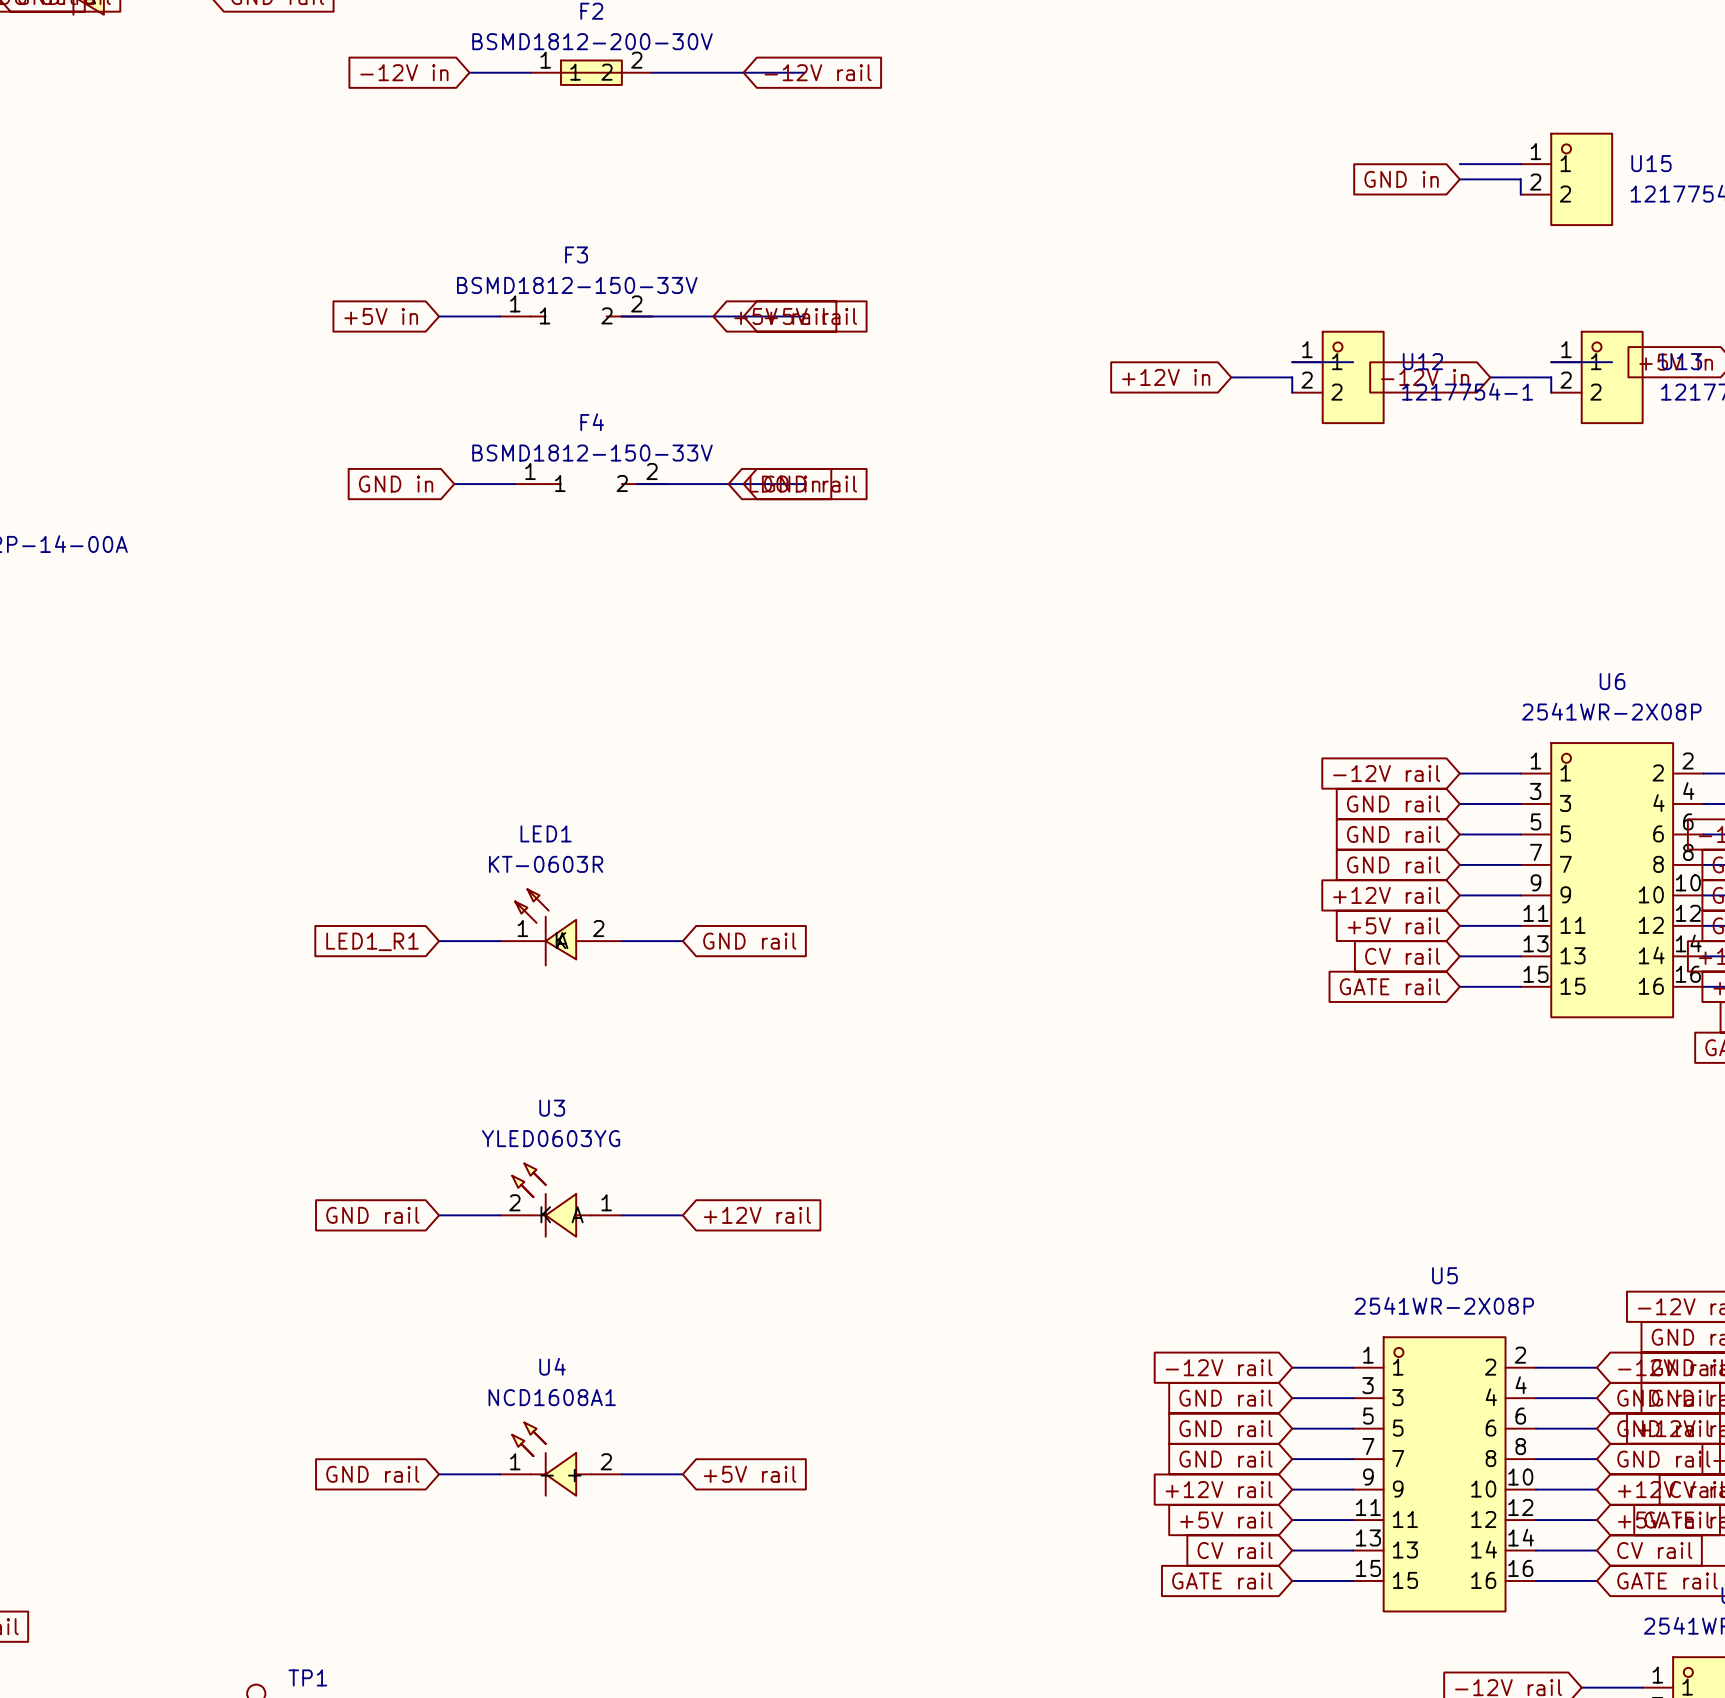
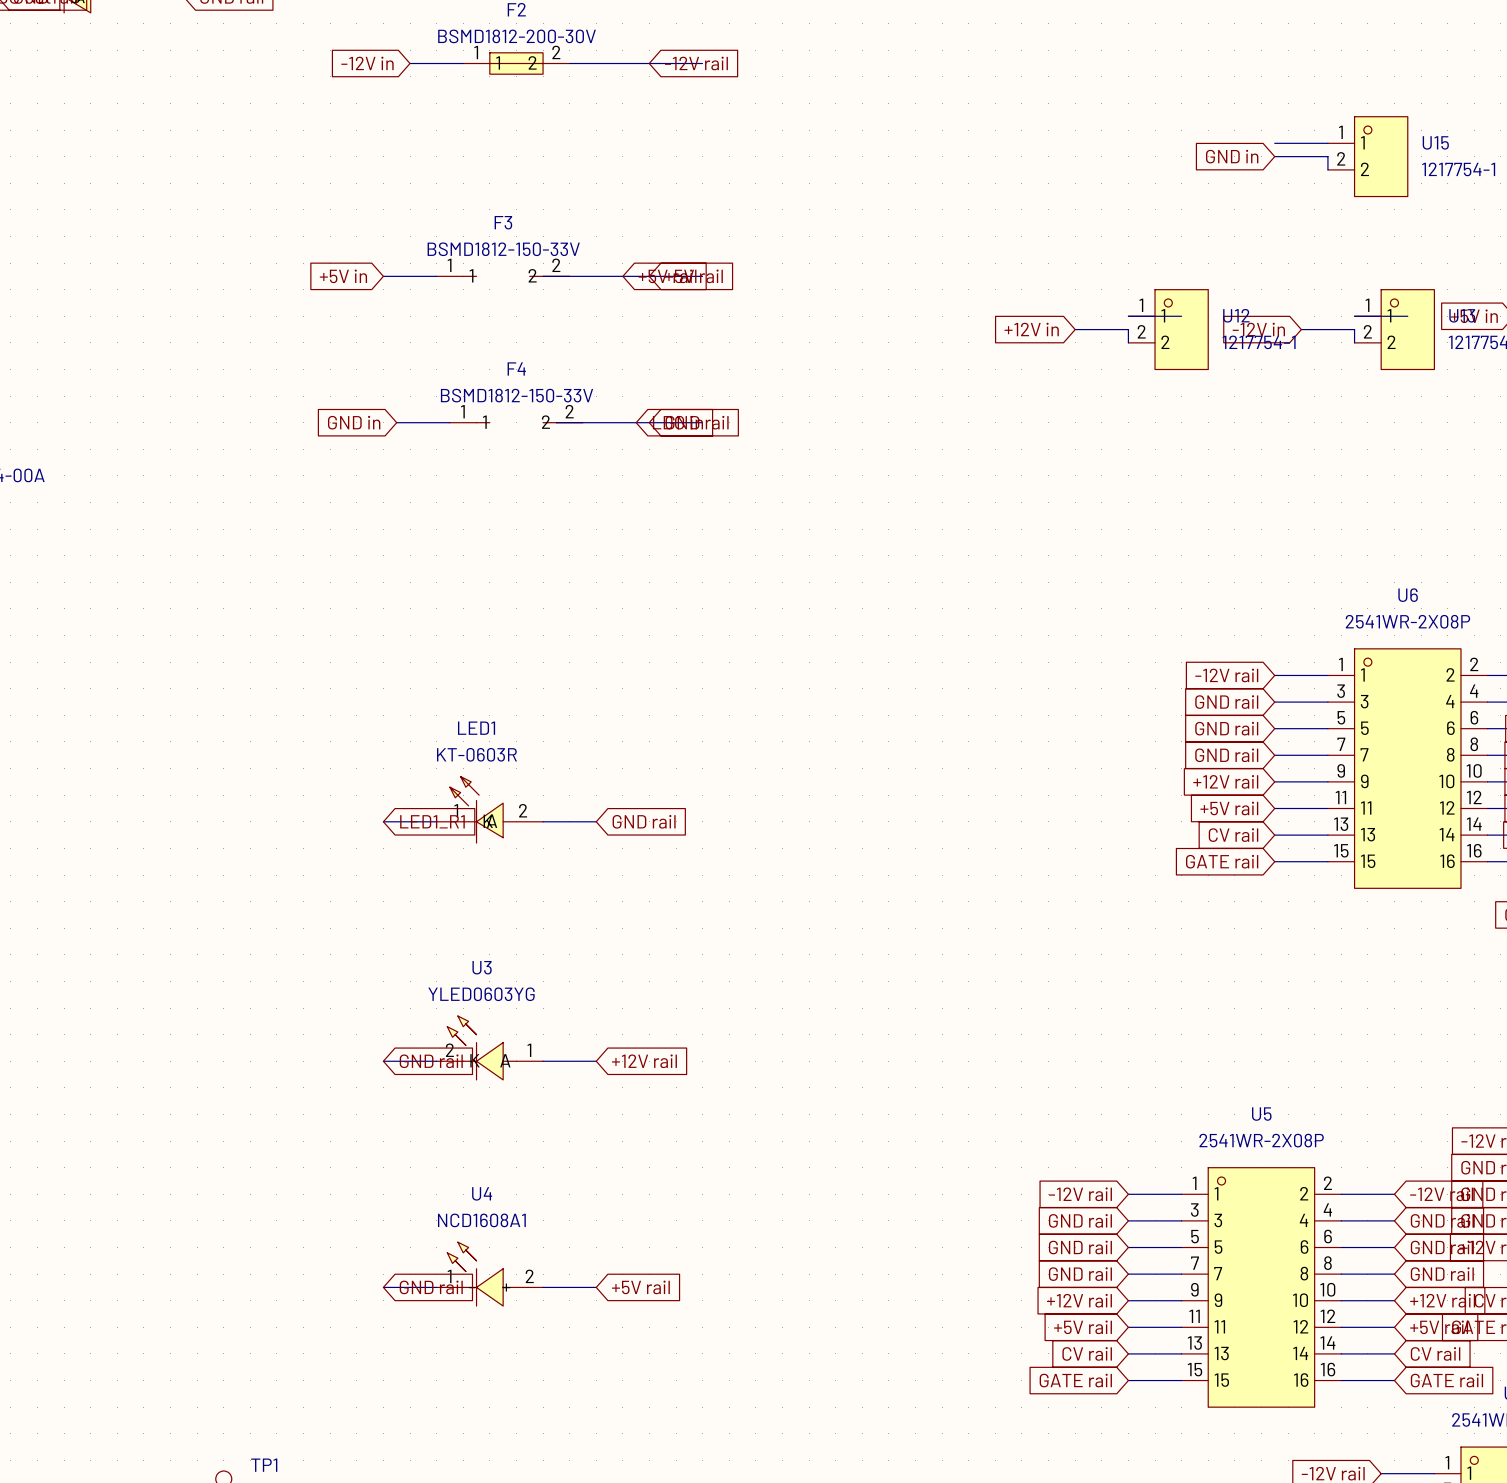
global label rotation: 0° (372, 941) -> 180° (432, 821)
global label rotation: 0° (372, 1215) -> 180° (431, 1061)
global label rotation: 0° (372, 1474) -> 180° (431, 1287)

